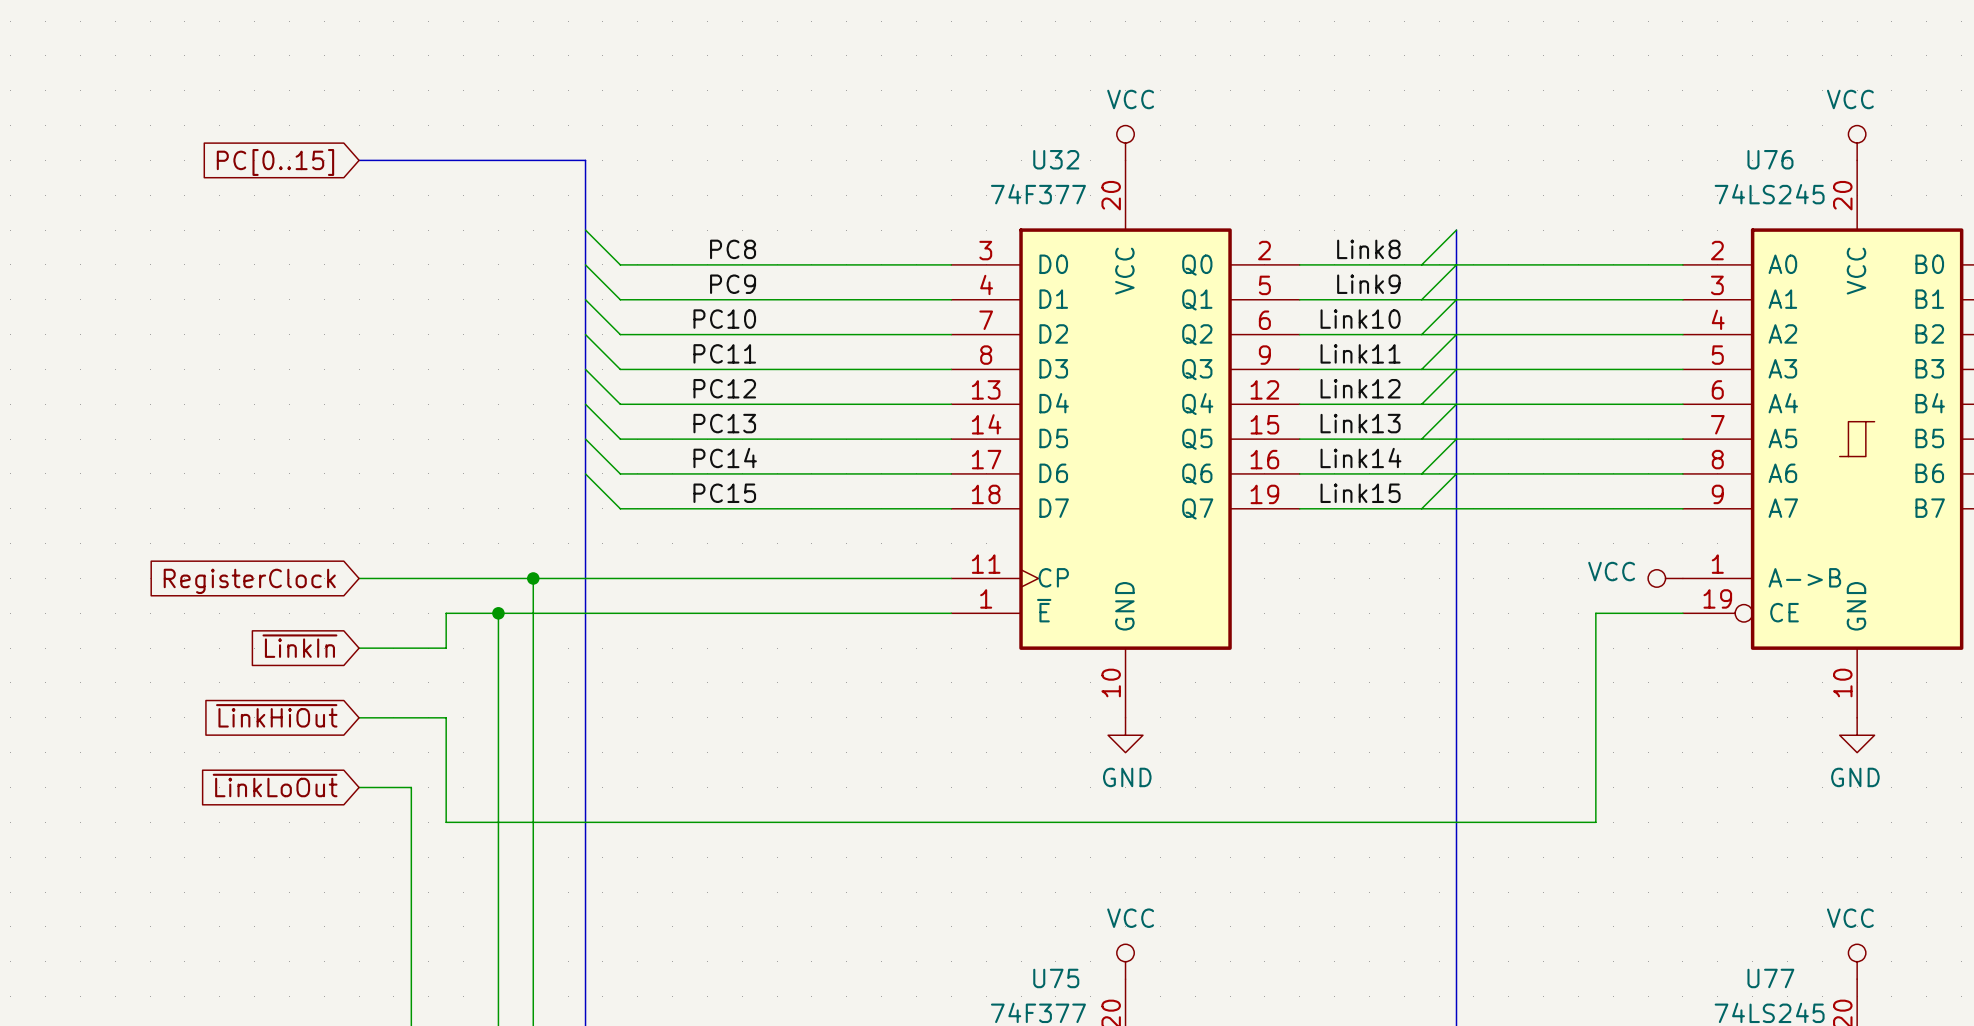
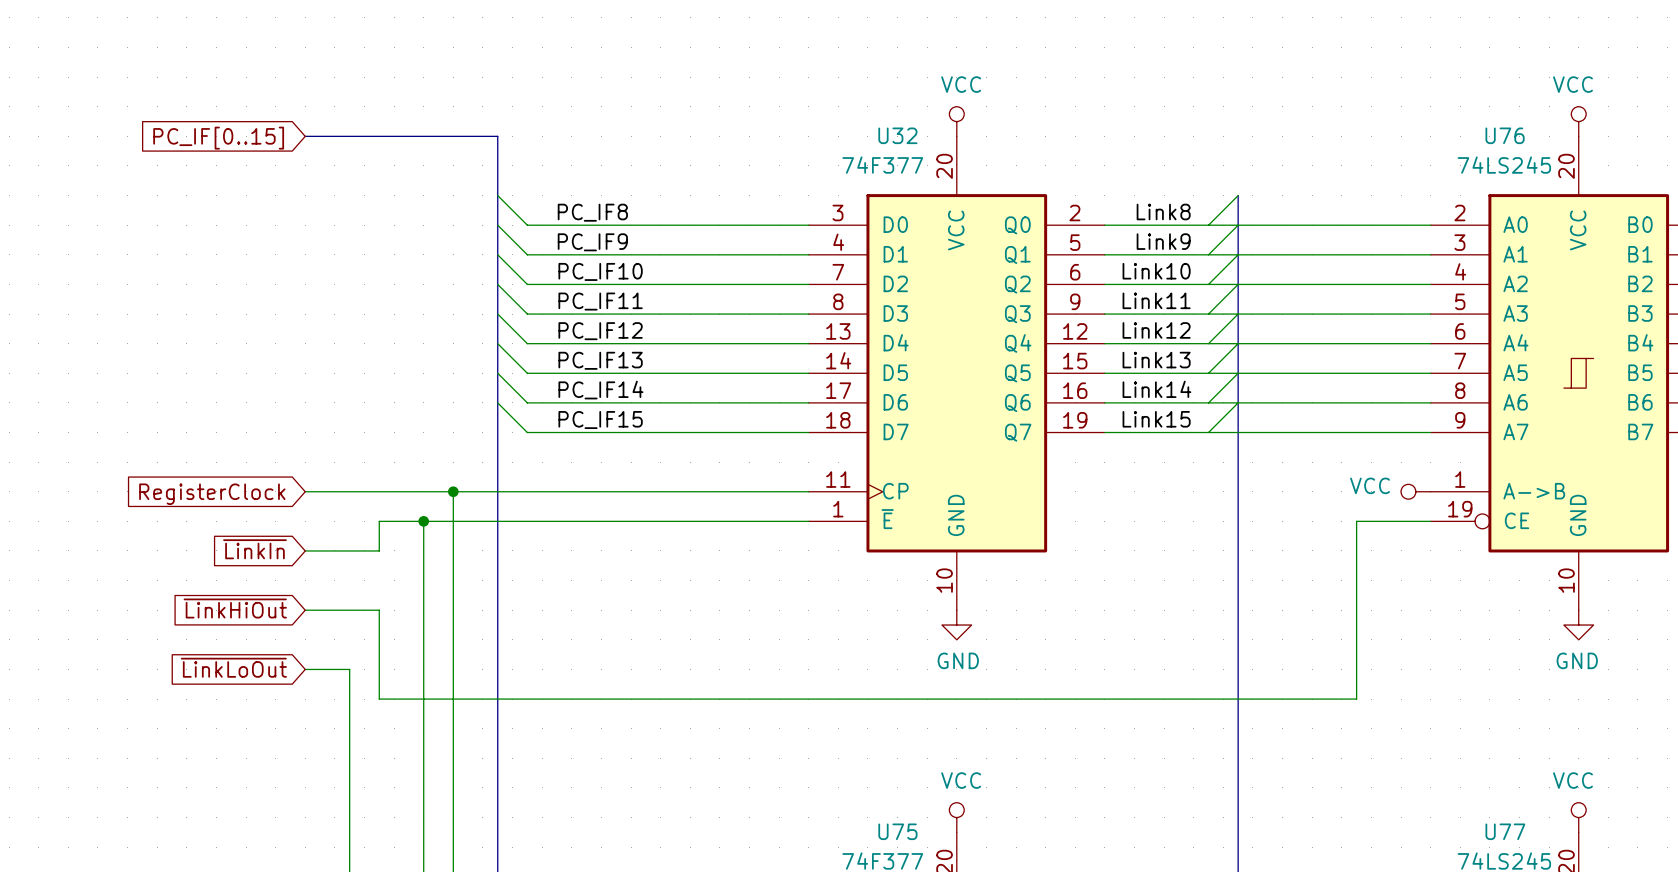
global label: PC[0..15] (275, 162) -> PC_IF[0..15] (218, 138)
label: PC8 (733, 249) -> PC_IF8 (592, 212)
label: PC9 (733, 284) -> PC_IF9 (592, 242)
label: PC10 (724, 319) -> PC_IF10 (600, 271)
label: PC11 (724, 353) -> PC_IF11 (600, 301)
label: PC12 (724, 388) -> PC_IF12 (600, 331)
label: PC13 (724, 423) -> PC_IF13 (600, 360)
label: PC14 (725, 457) -> PC_IF14 (600, 390)
label: PC15 (724, 493) -> PC_IF15 (600, 420)

